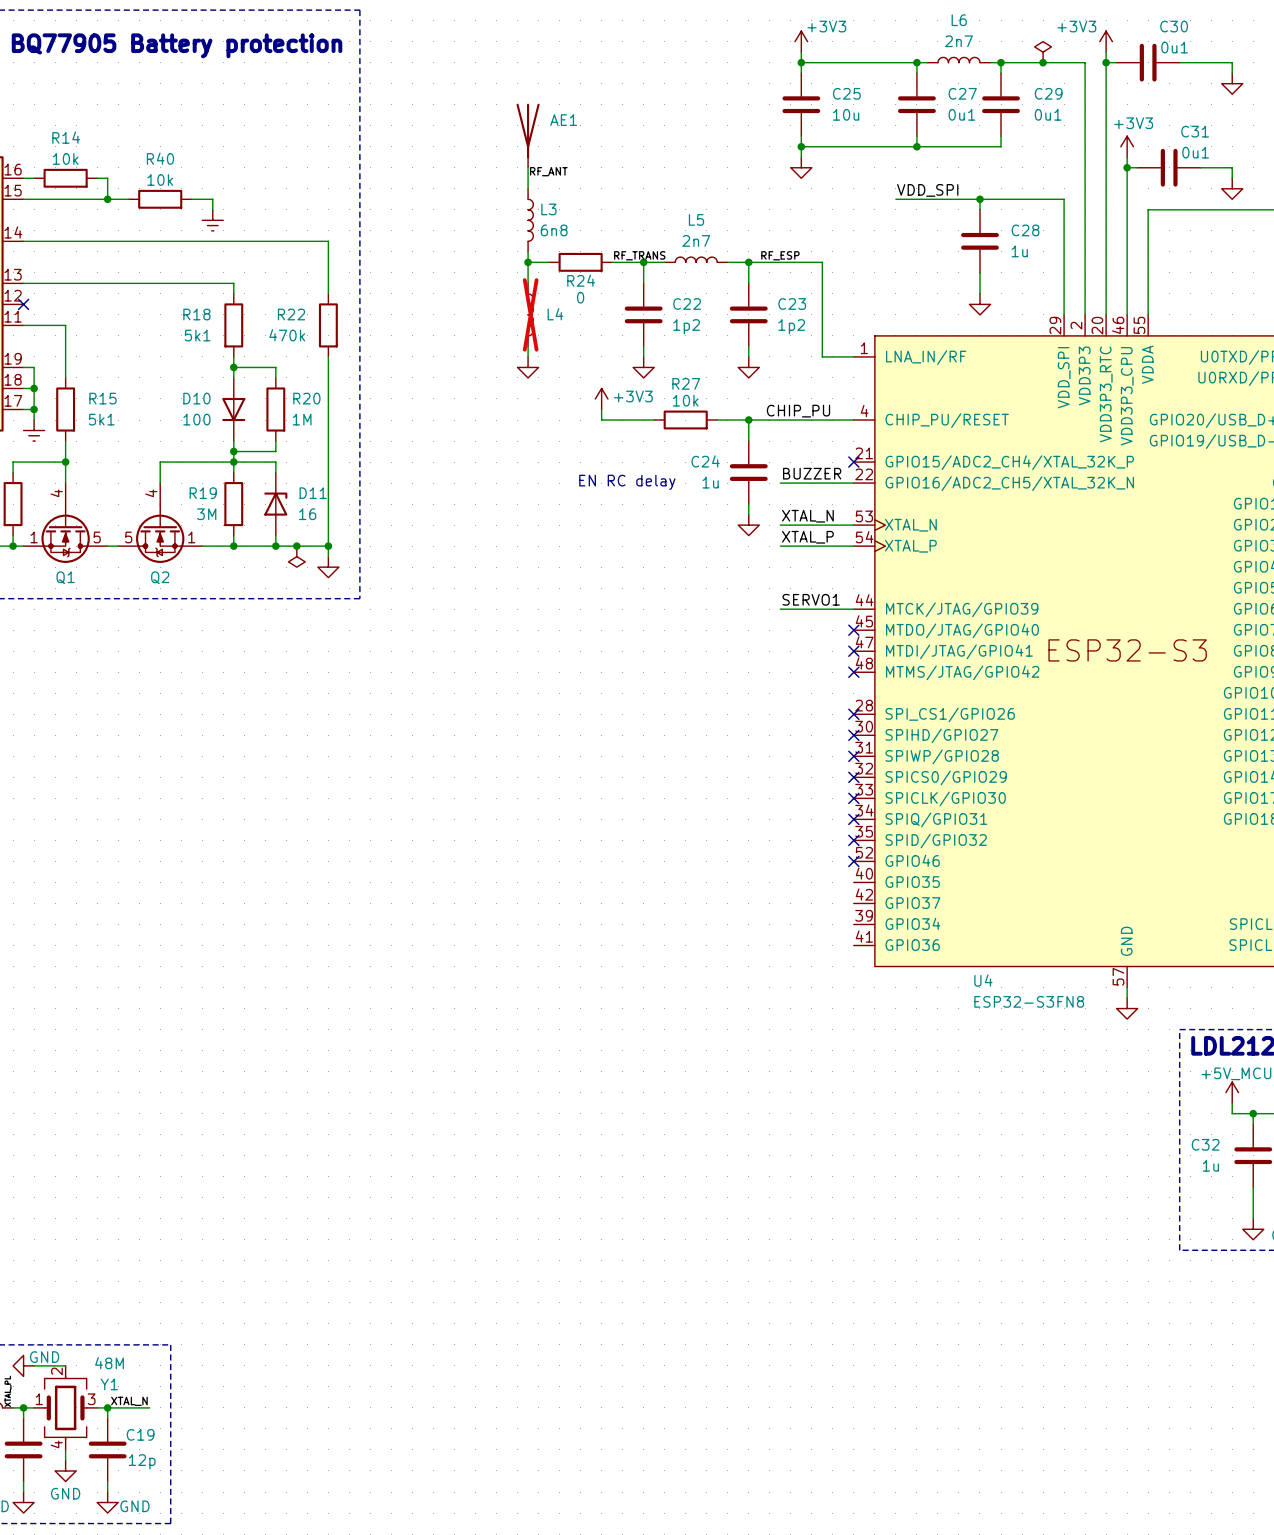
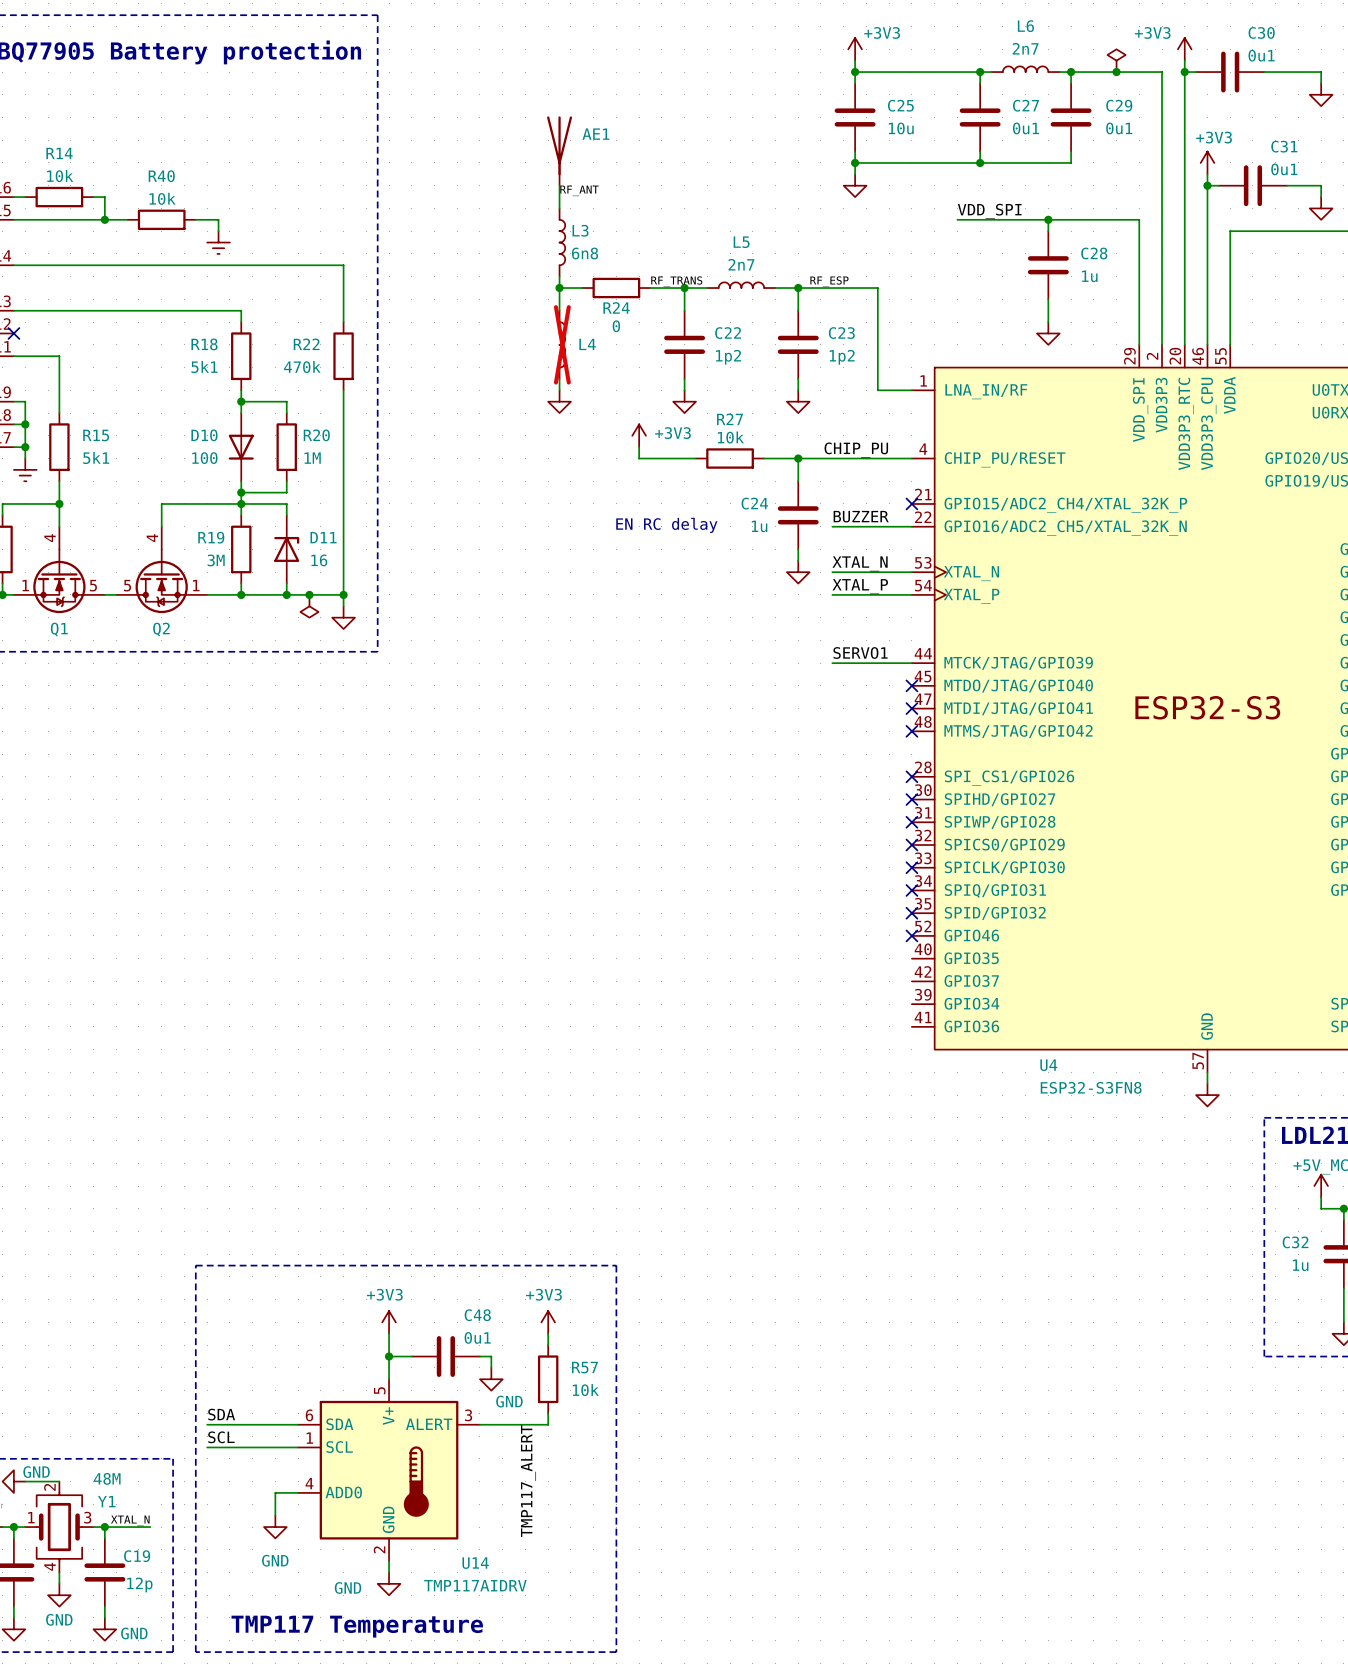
line: none -> (195, 1265) (616, 1265) (616, 1652) (195, 1652) (195, 1265)
power symbol: none -> +3V3 (389, 1322)
power symbol: none -> +3V3 (548, 1322)
wire: none -> (389, 1333) (389, 1379)
wire: none -> (548, 1333) (548, 1345)
wire: none -> (389, 1356) (411, 1356)
junction: none -> (389, 1356)
C48: none -> 0u1 (445, 1356)
wire: none -> (479, 1356) (491, 1356) (491, 1367)
power symbol: none -> GND (491, 1379)
R57: none -> 10k (548, 1379)
wire: none -> (548, 1413) (548, 1424) (479, 1424)
label: none -> SDA (221, 1414)
wire: none -> (207, 1424) (298, 1424)
label: none -> SCL (221, 1437)
wire: none -> (207, 1447) (298, 1447)
U14: none -> TMP117AIDRV (389, 1470)
label: none -> TMP117_ALERT (528, 1481)
wire: none -> (298, 1492) (275, 1492) (275, 1515)
power symbol: none -> GND (275, 1527)
wire: none -> (389, 1561) (389, 1572)
power symbol: none -> GND (389, 1583)
text: none -> TMP117 Temperature (357, 1626)

